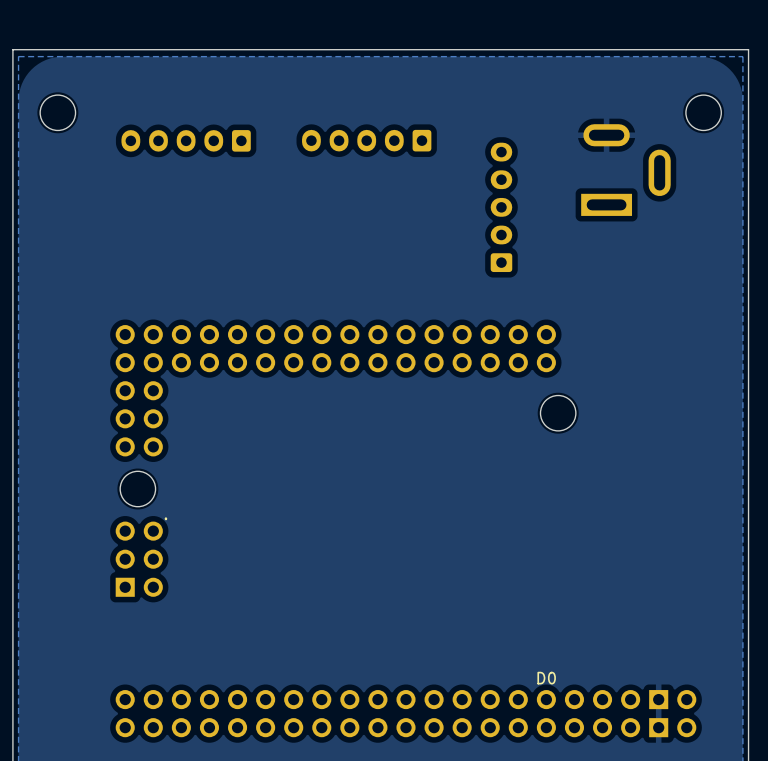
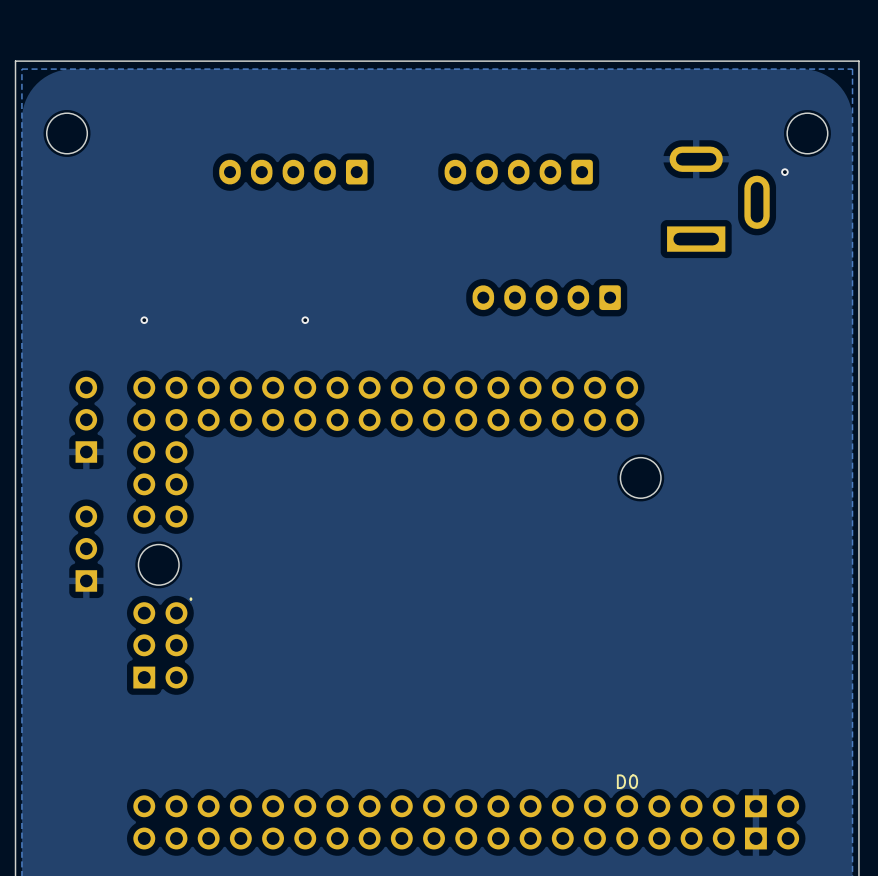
part: (186, 140) -> none
part: (366, 140) -> none
part: none -> (293, 172)
part: none -> (518, 172)
via: none -> (784, 172)
part: (501, 207) -> none
part: none -> (546, 297)
via: none -> (144, 320)
via: none -> (305, 320)
part: none -> (86, 419)
part: none -> (86, 548)

